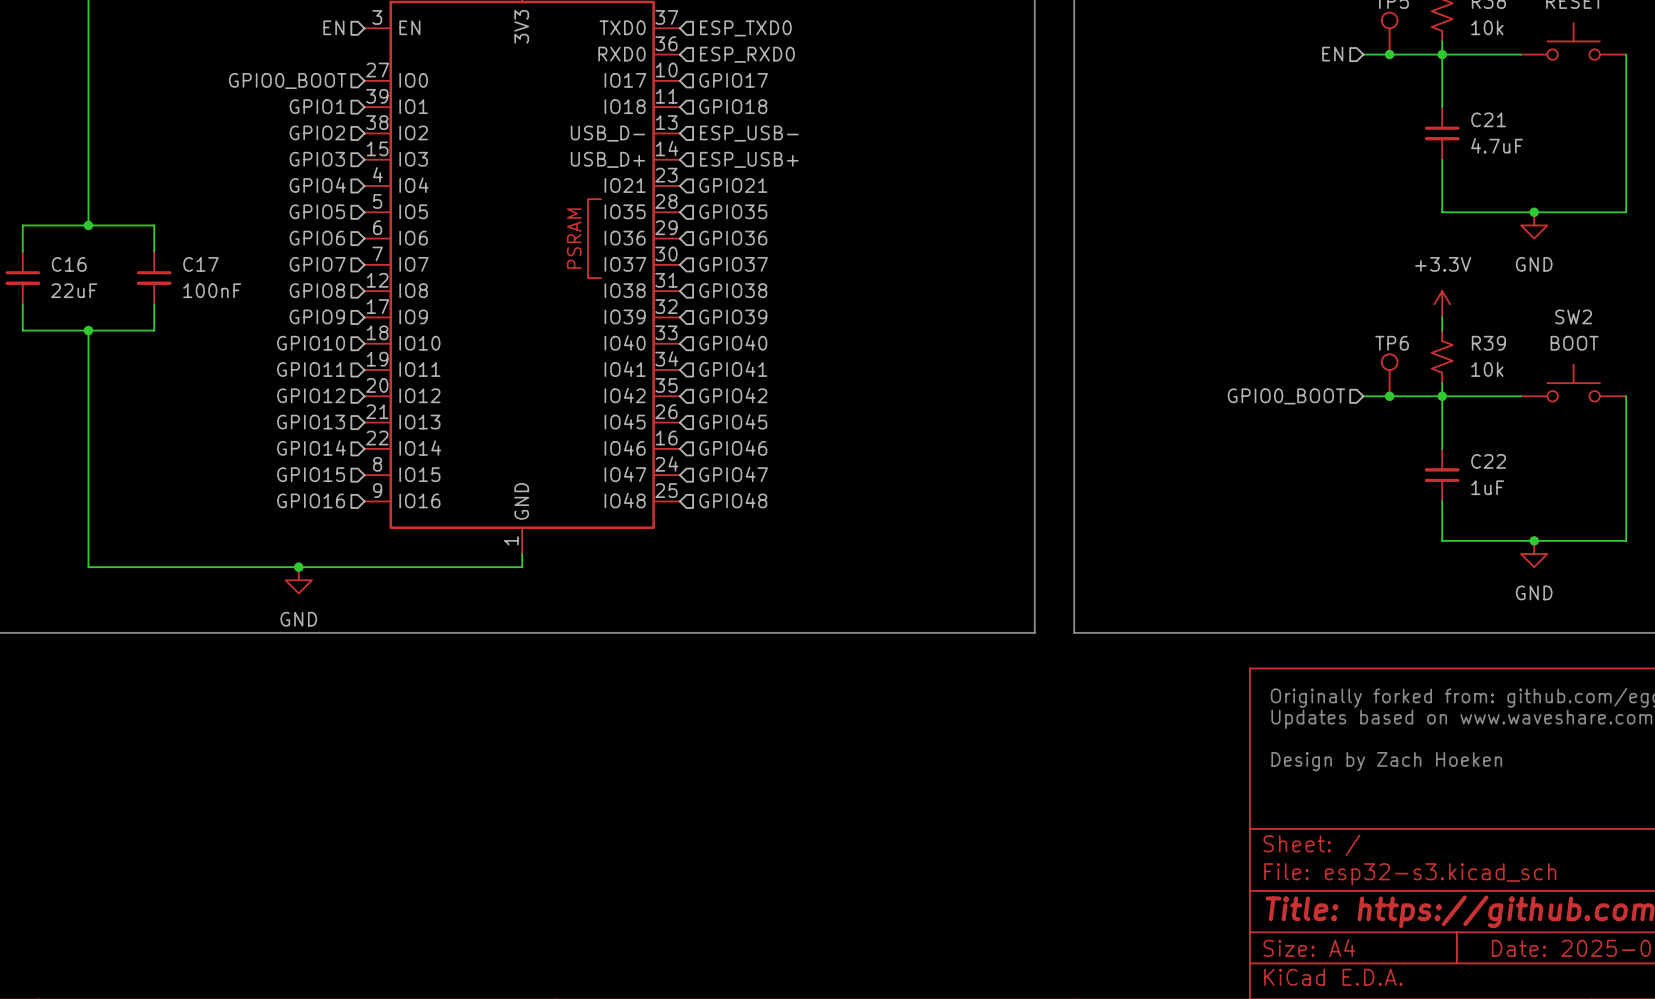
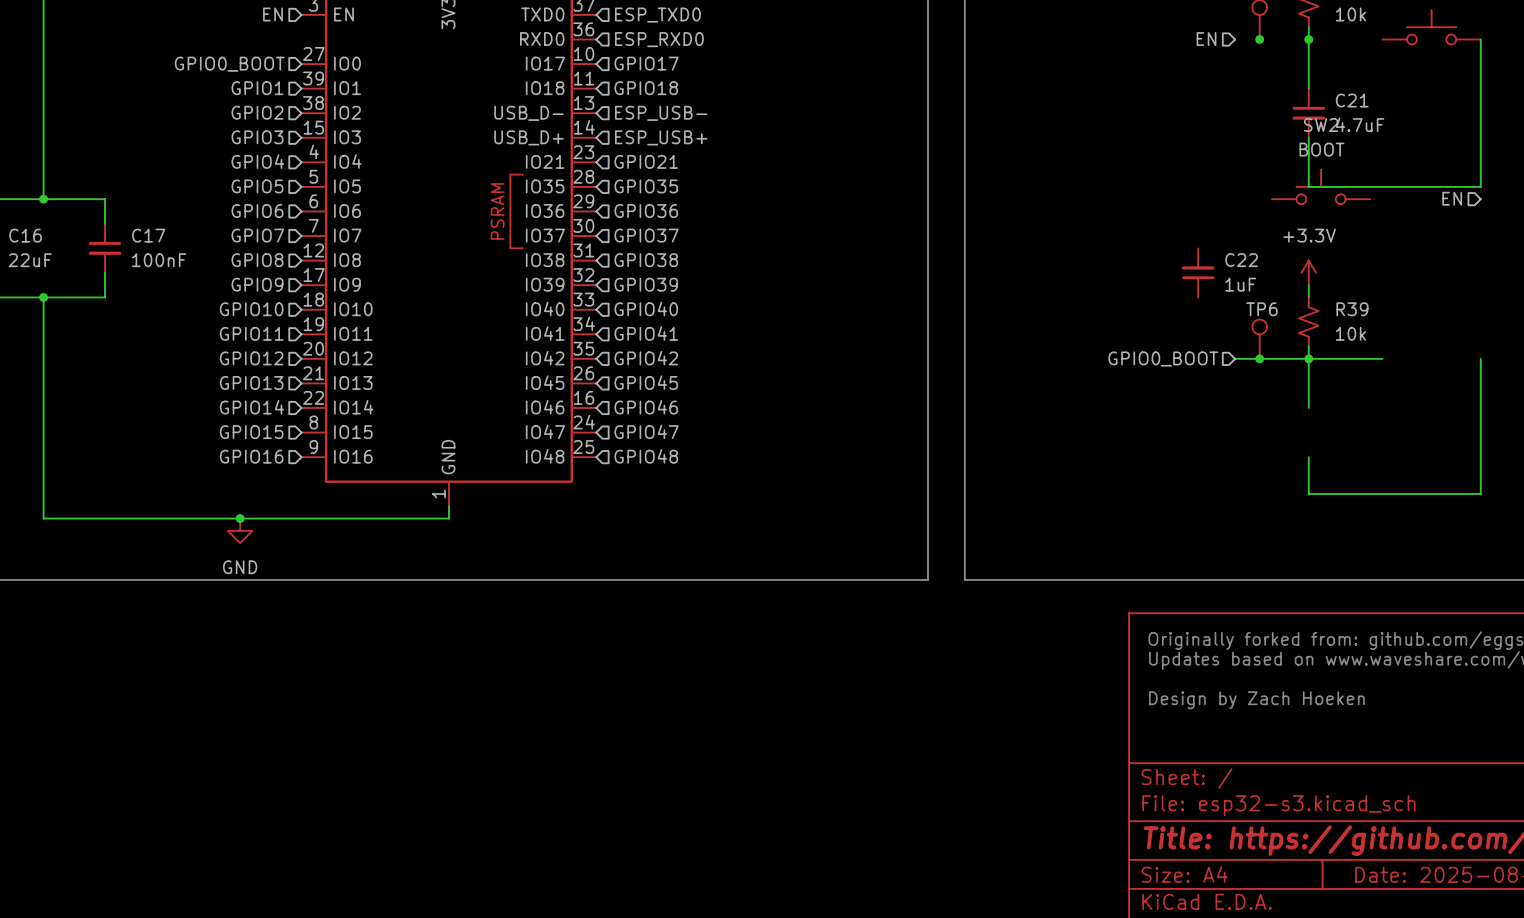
wire: (1363, 54) (1521, 54) -> none
junction: (1534, 212) -> none
hierarchical label: none -> EN (1452, 198)
power symbol: GND (1534, 225) -> none
SW2 position: (1573, 383) -> (1321, 186)
C22 position: (1442, 475) -> (1198, 272)
junction: (1534, 540) -> none
power symbol: GND (1534, 554) -> none

